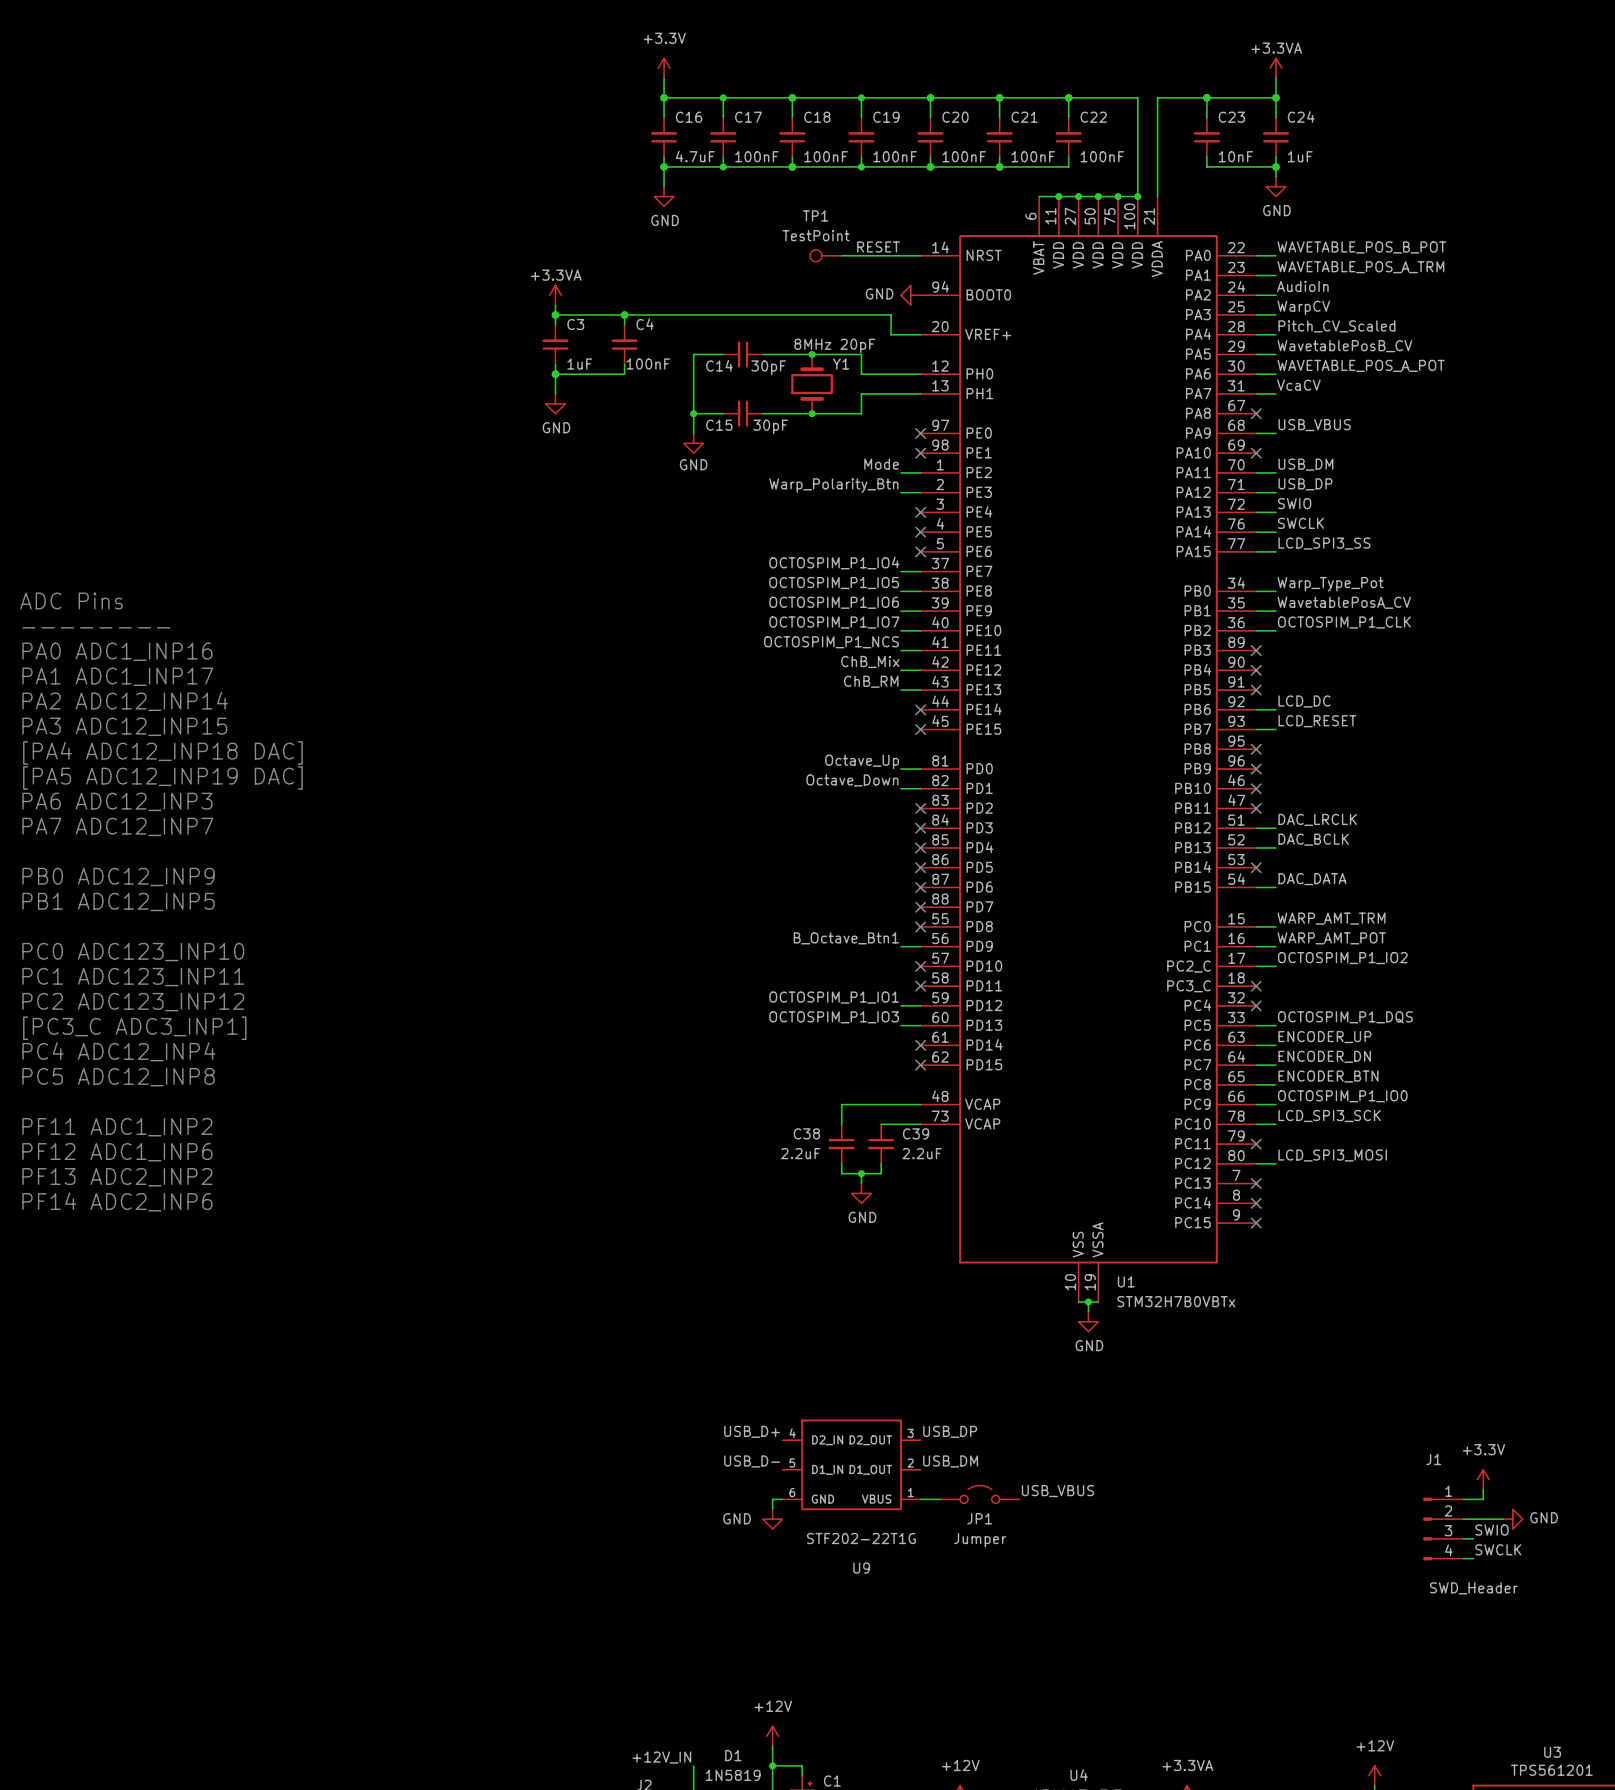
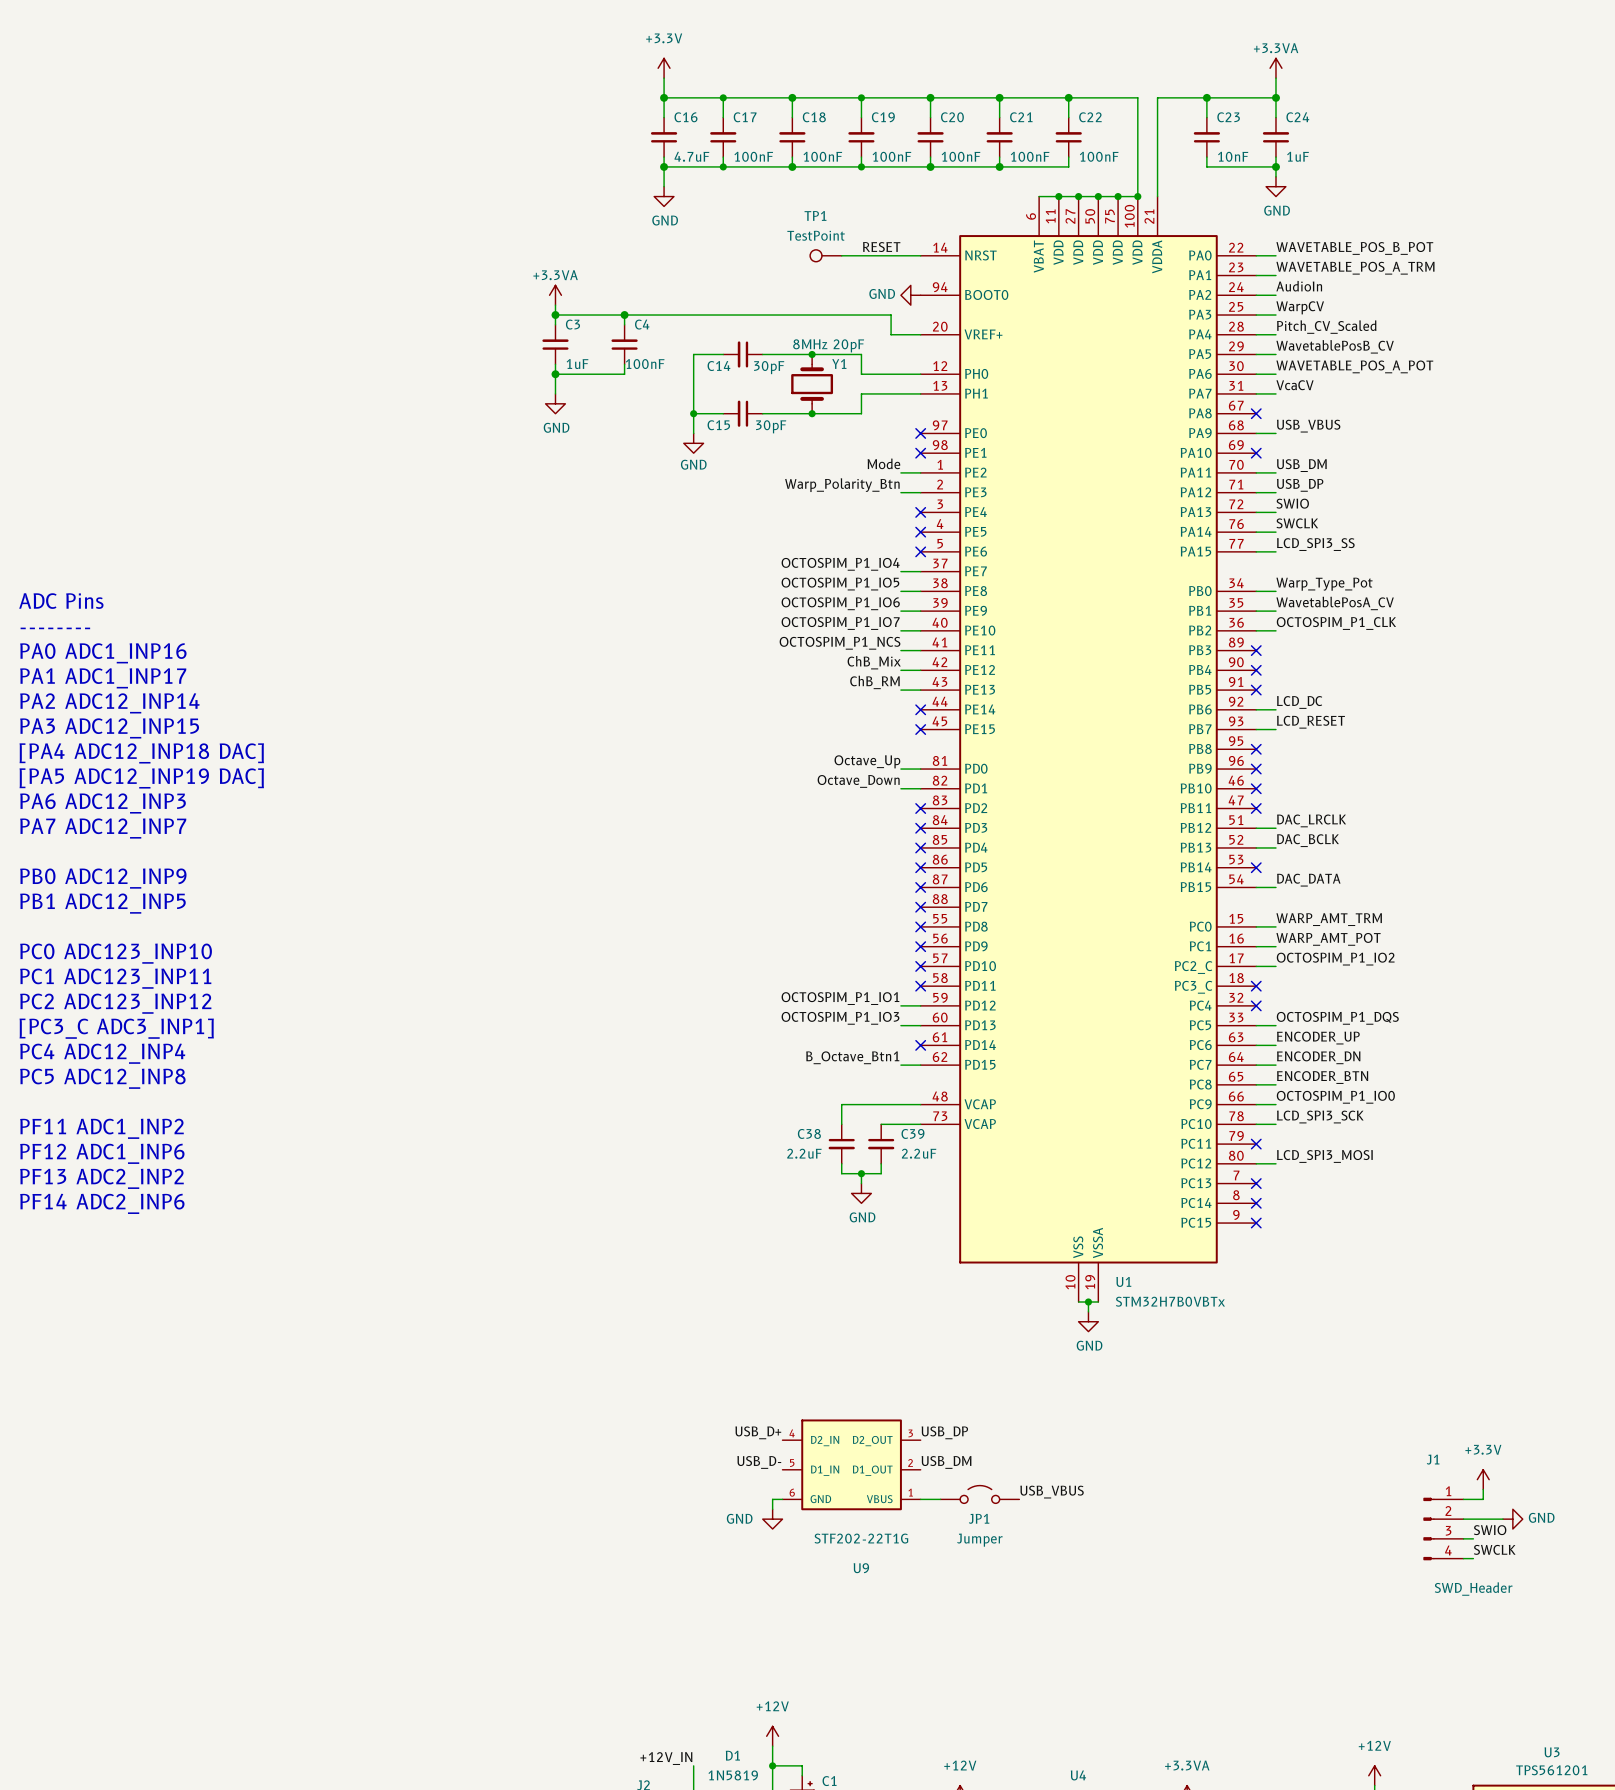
label position: B_Octave_Btn1 (846, 938) -> B_Octave_Btn1 (852, 1057)
wire: (900, 946) (920, 946) -> (900, 1065) (920, 1065)
no-connect mark: none -> (920, 946)
no-connect mark: (920, 1065) -> none

